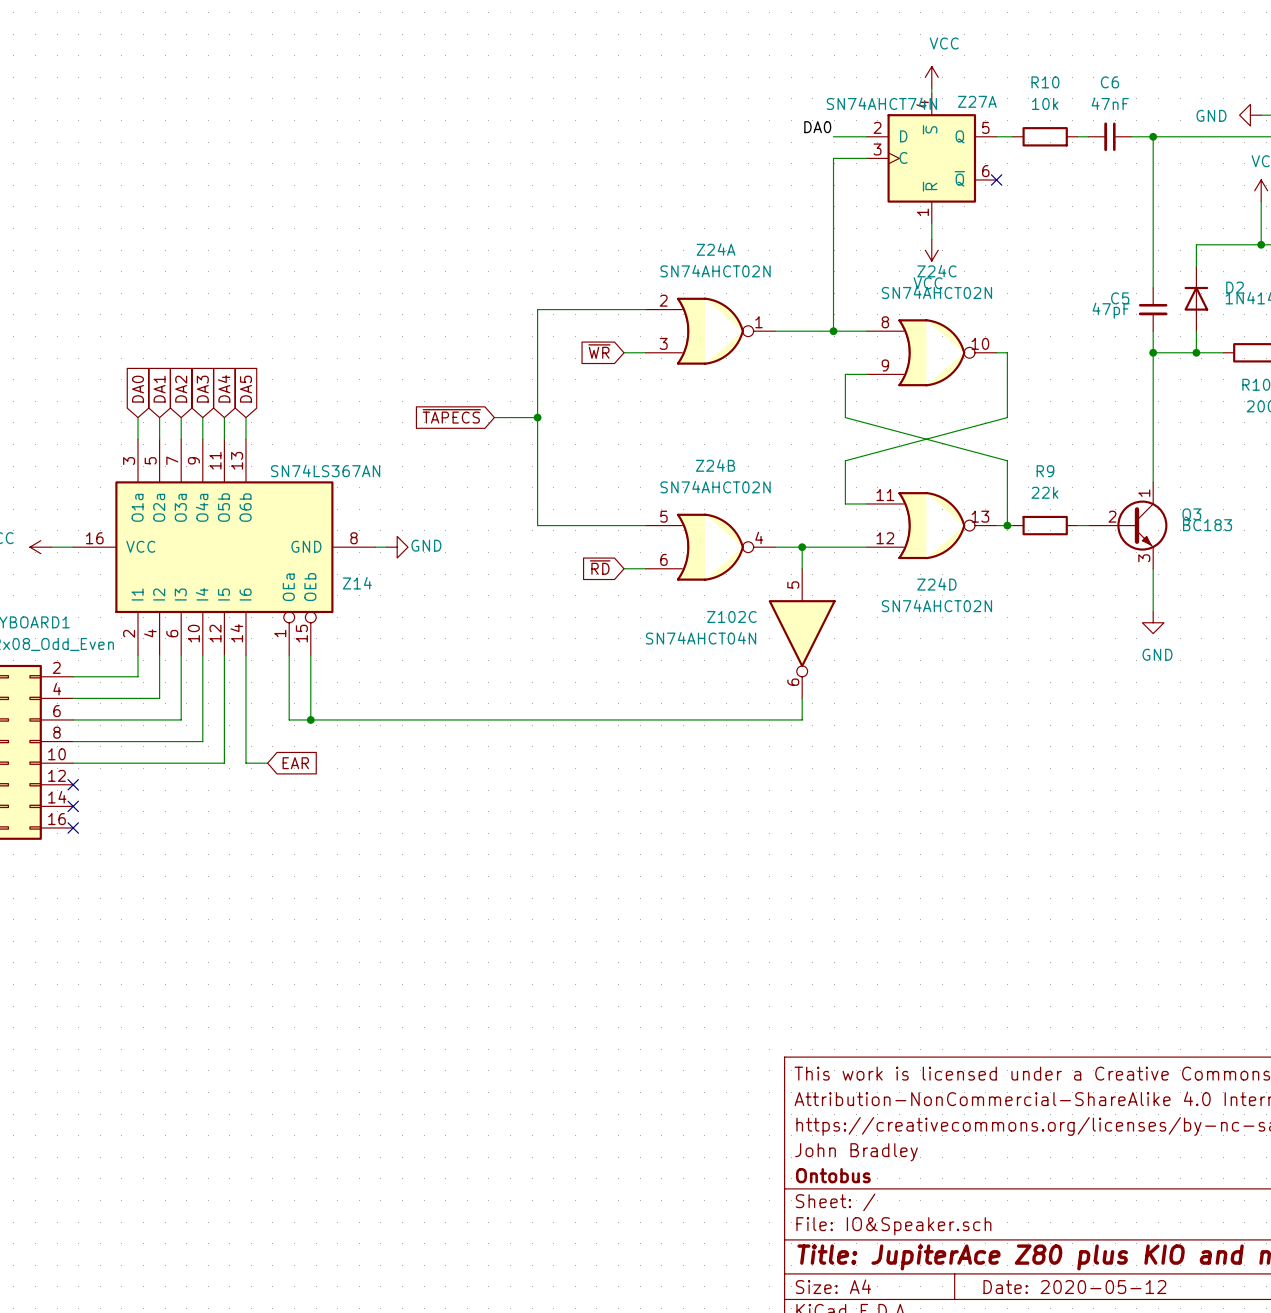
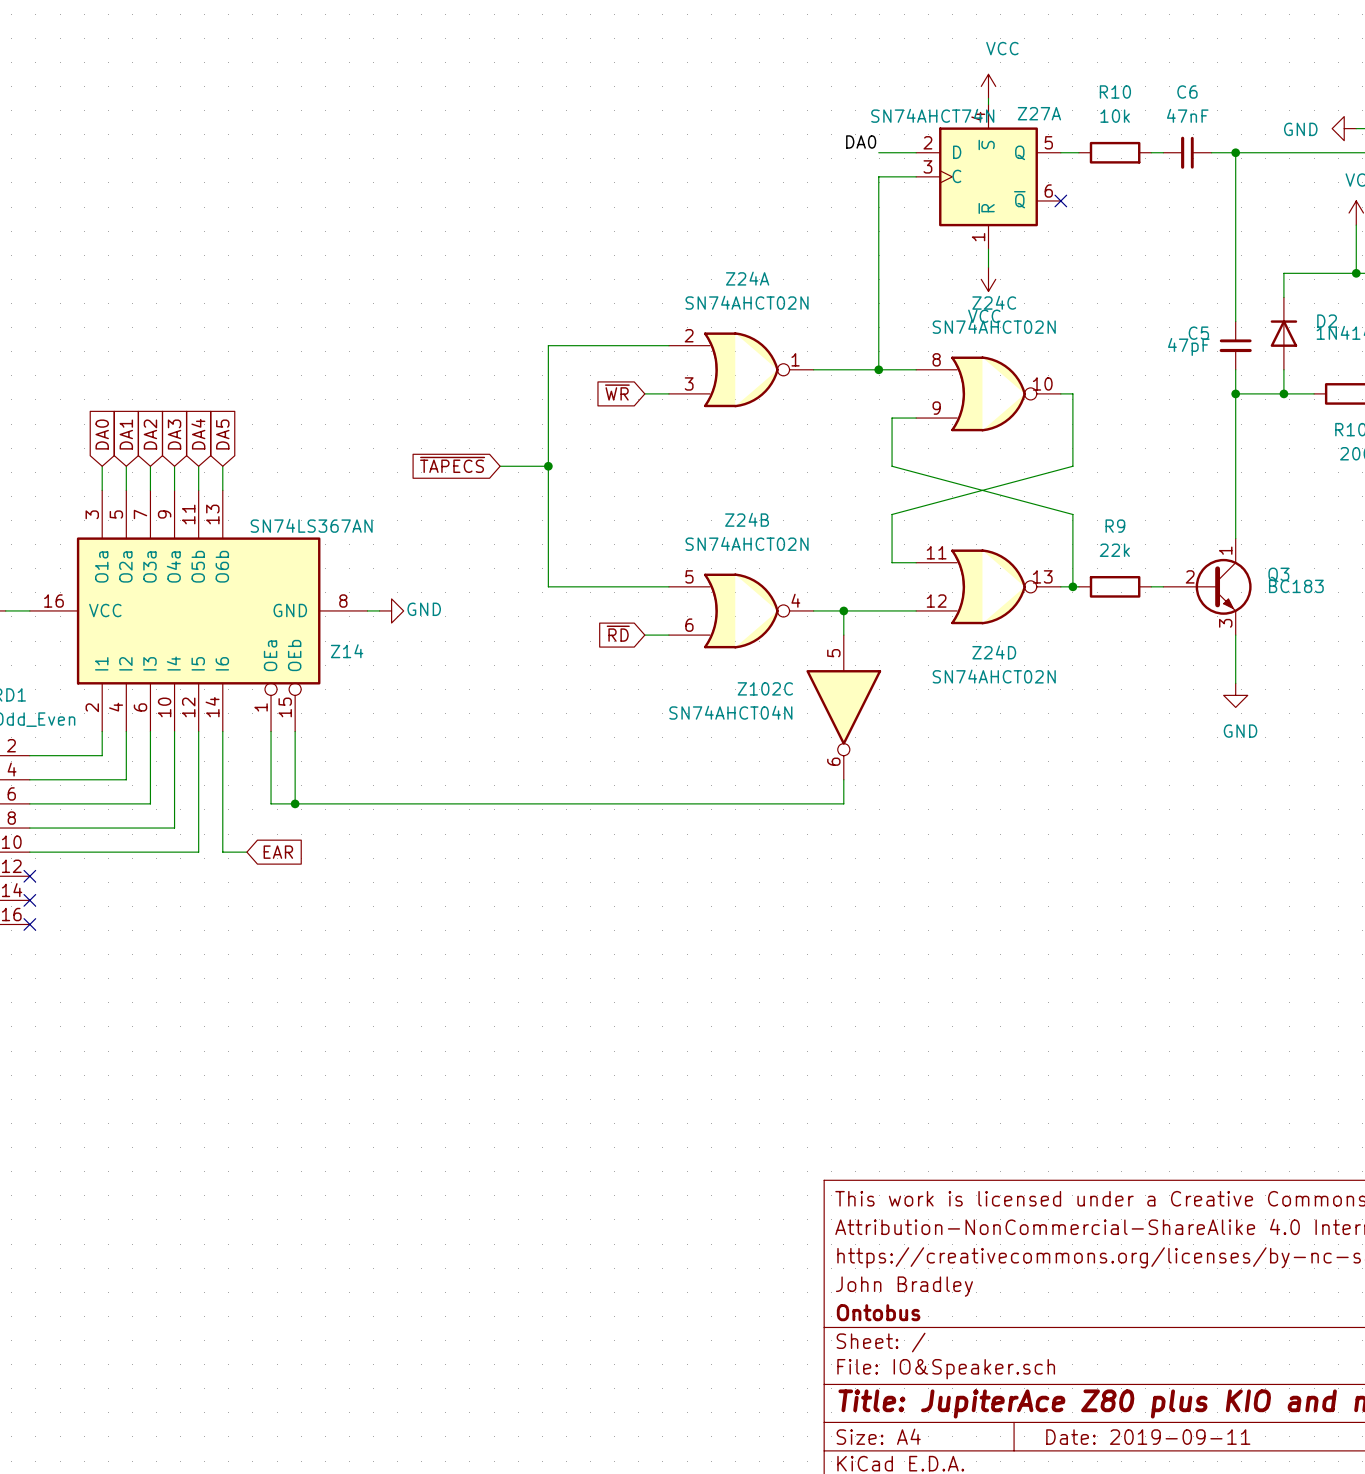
title block: Date: 2020-05-12 (1074, 1287) -> Date: 2019-09-11 (1148, 1437)

